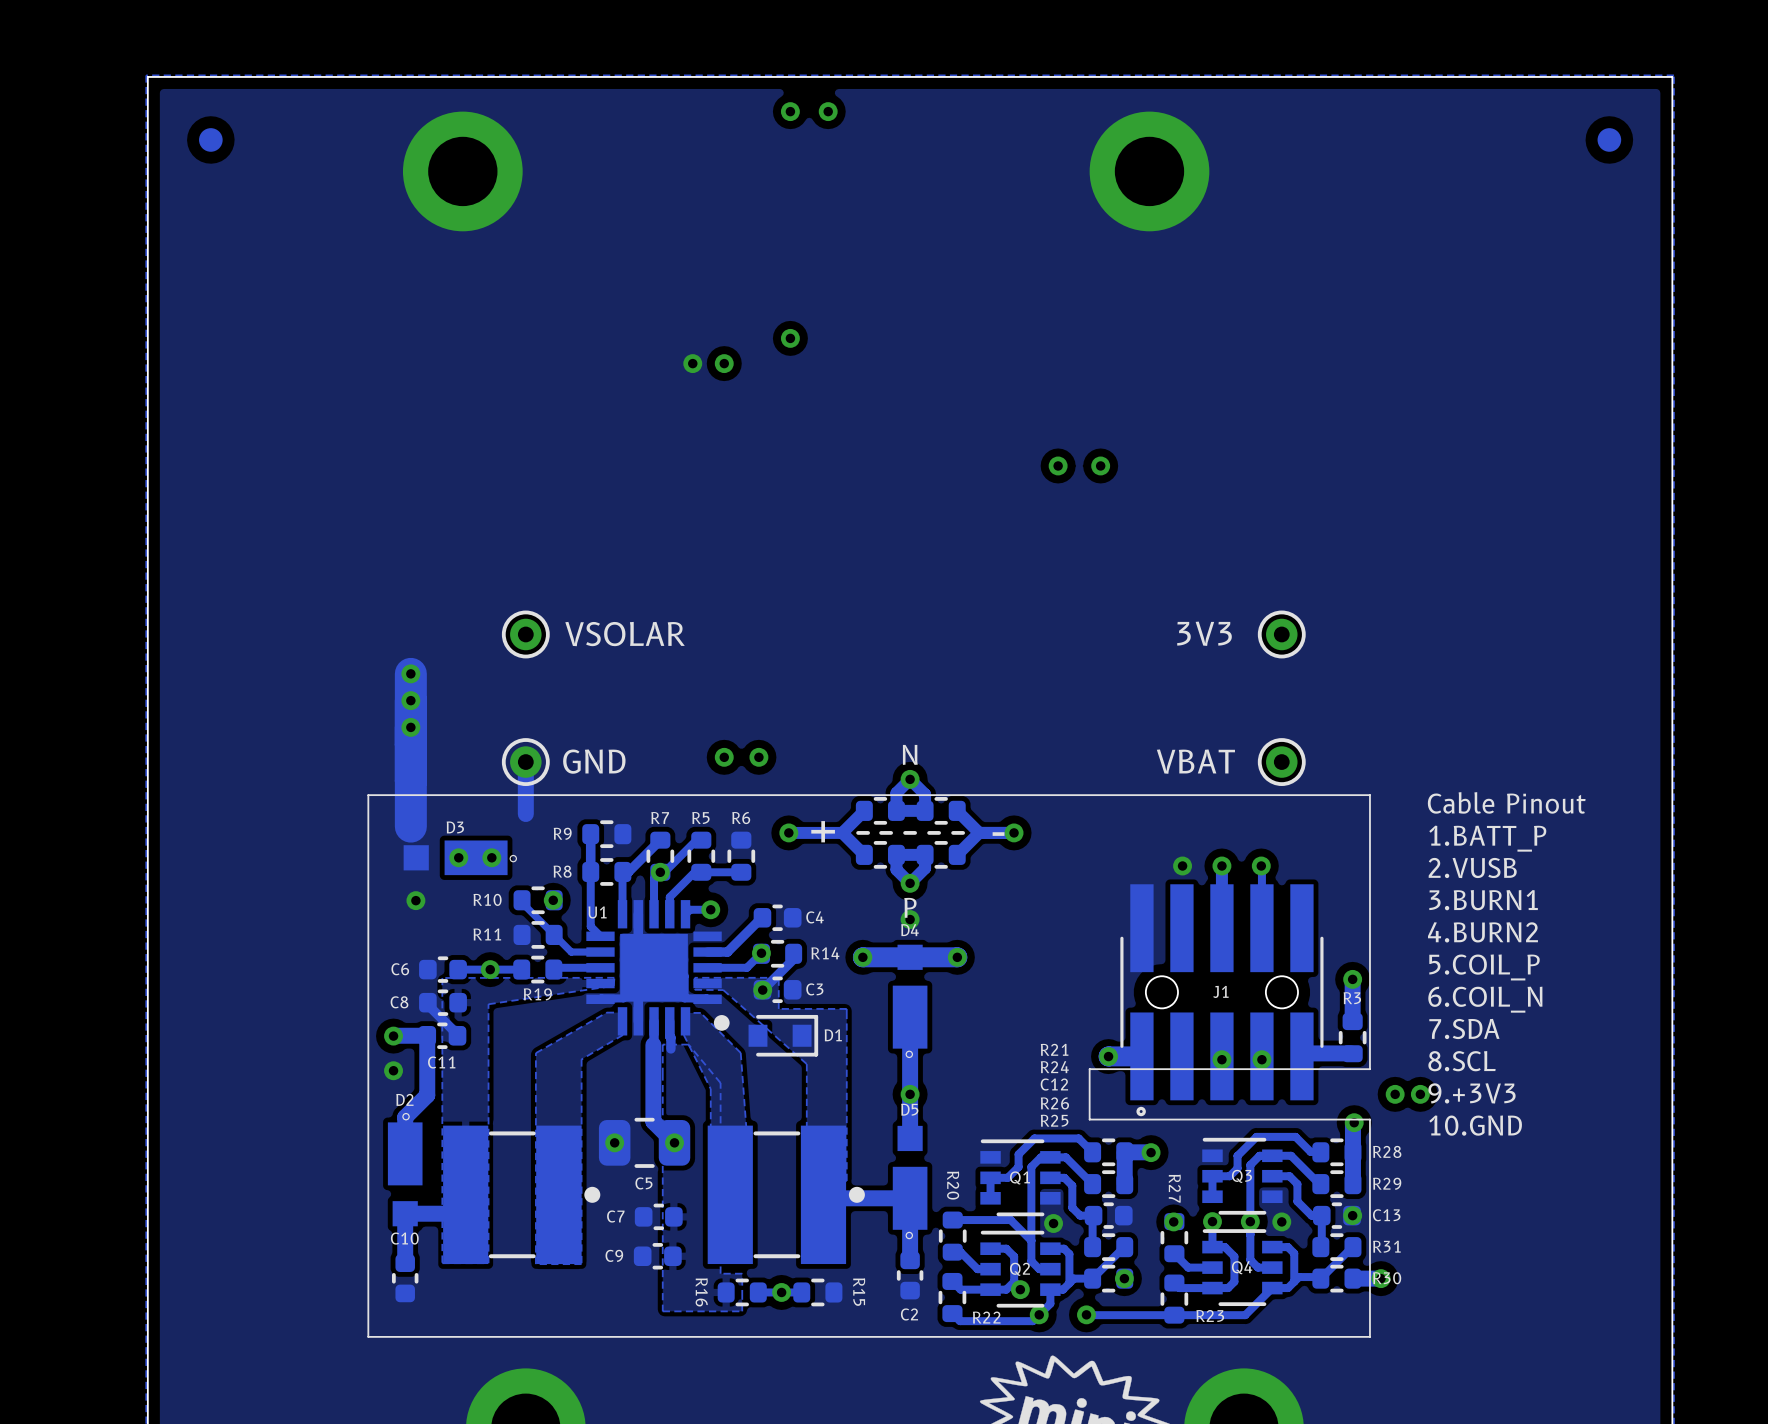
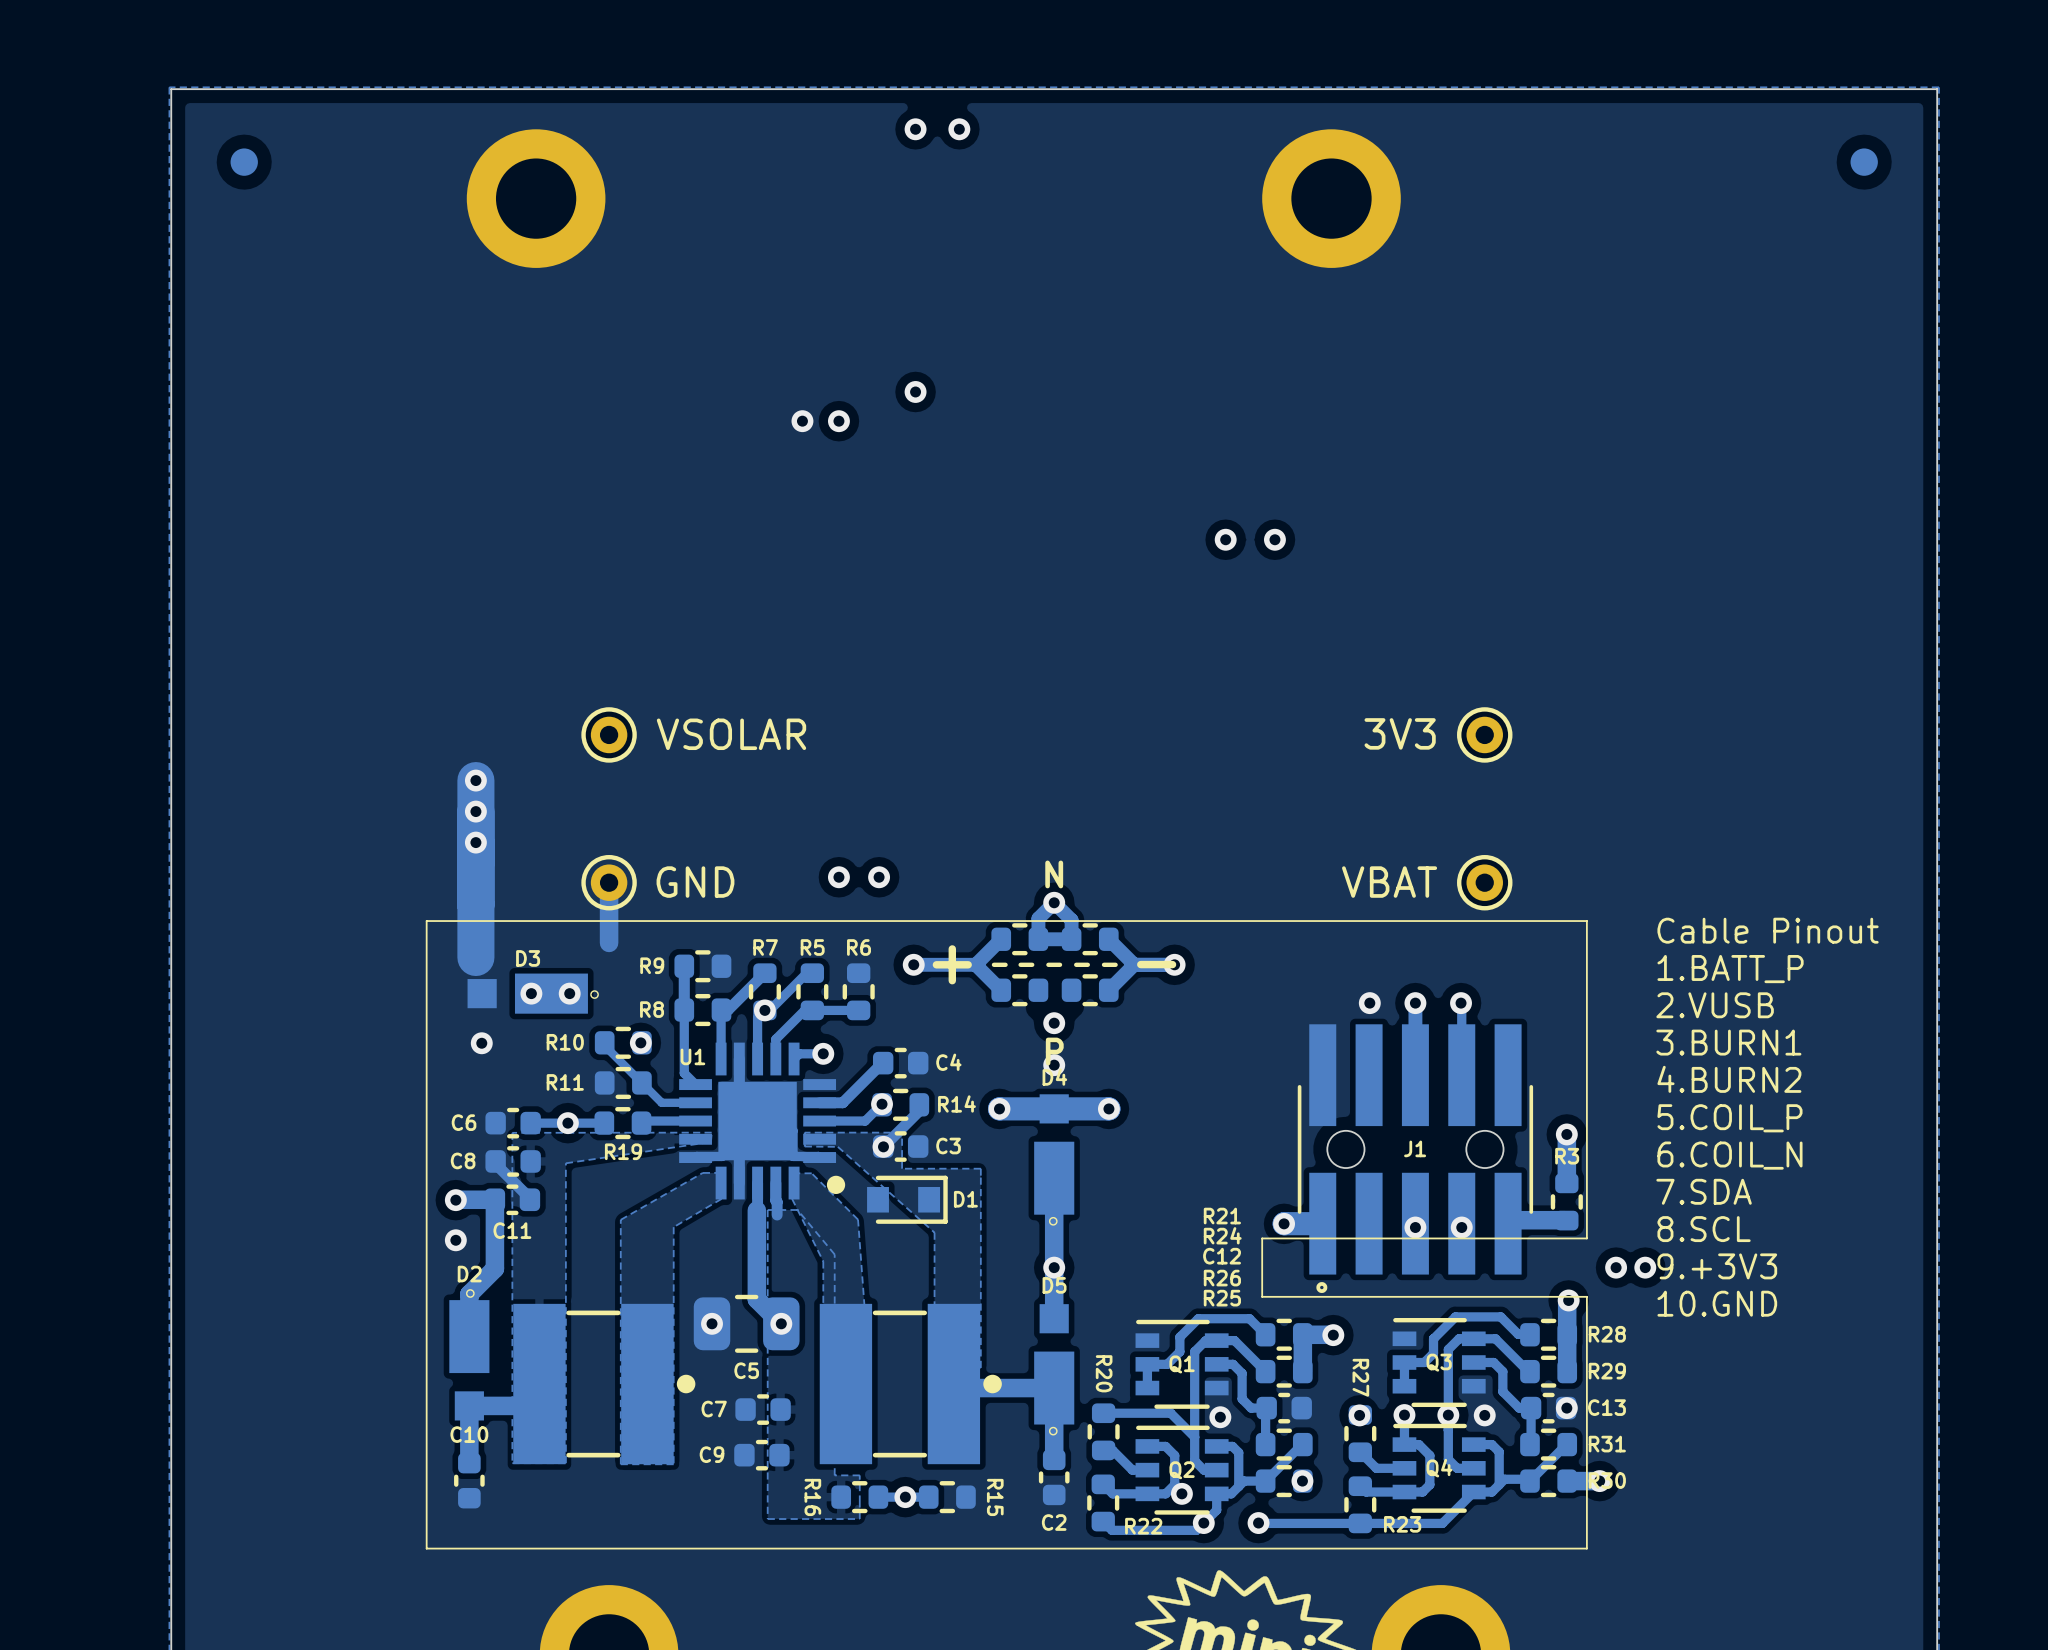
track: (925, 854) (925, 868) (910, 883) (896, 869) (896, 854) (925, 854) -> none

